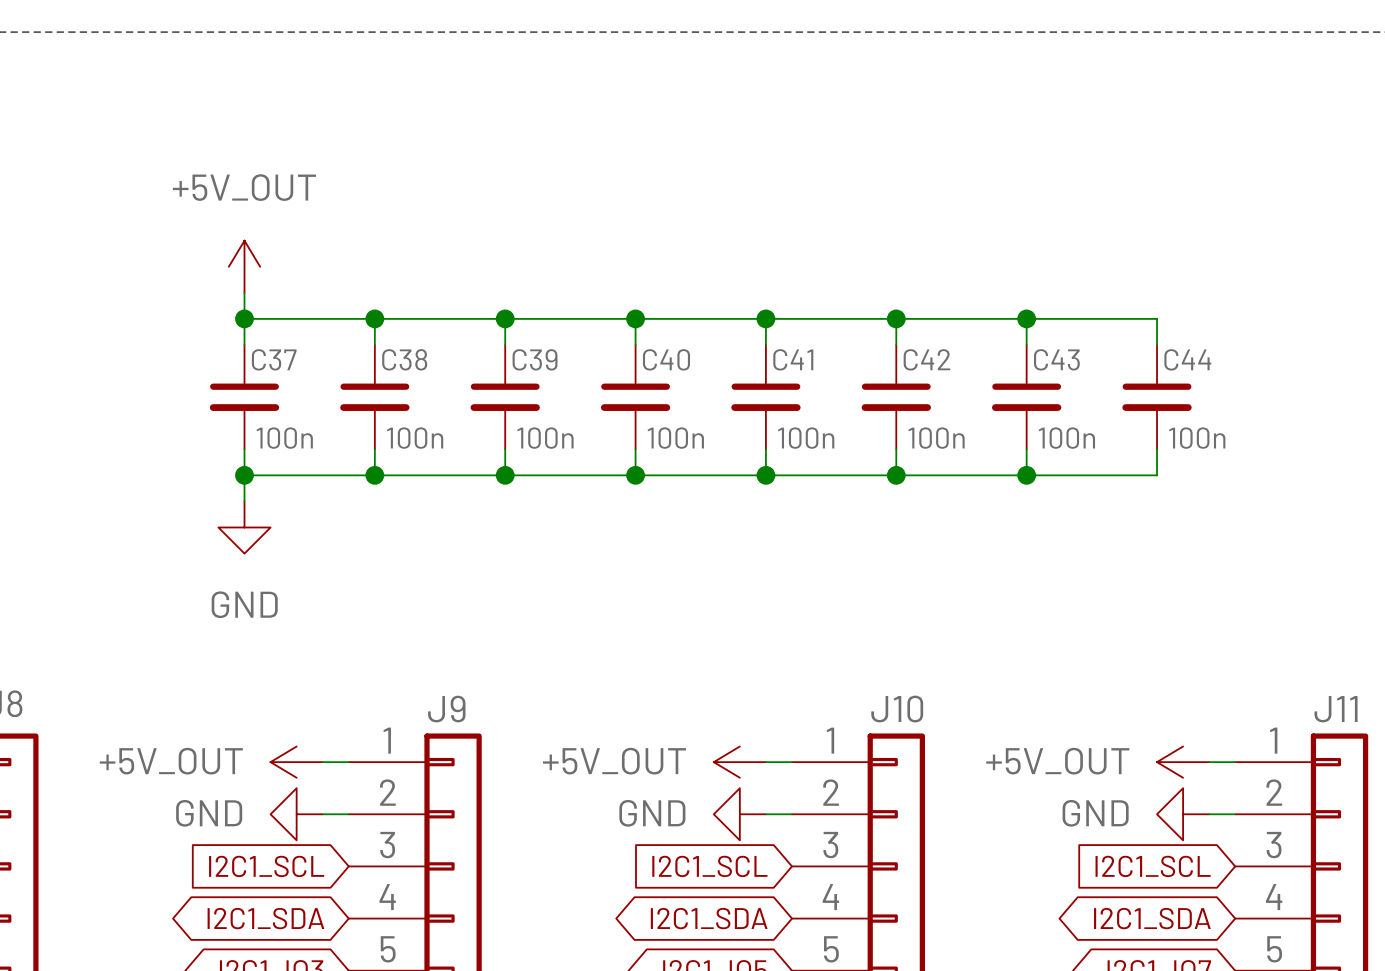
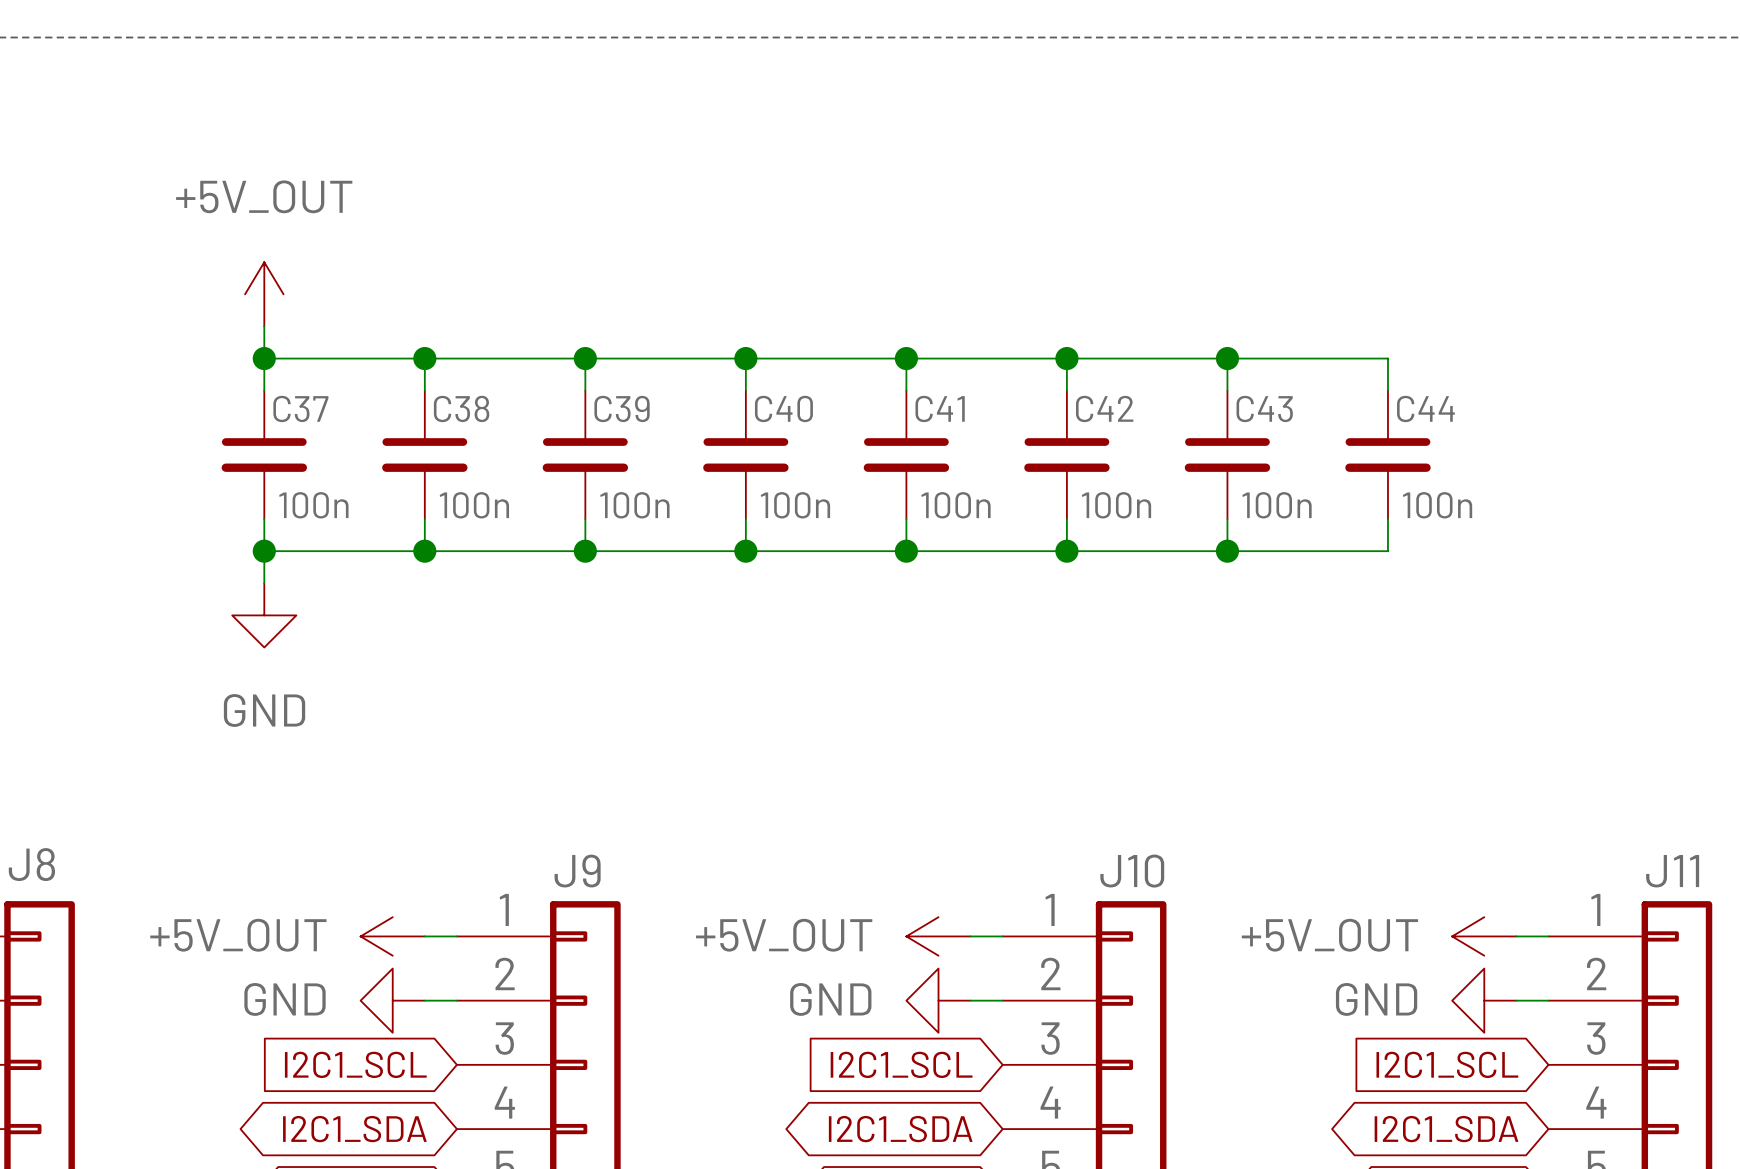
power symbol position: +5V_OUT (244, 266) -> +5V_OUT (264, 294)
junction: none -> (264, 358)
wire: (244, 292) (244, 344) -> (264, 326) (264, 390)
junction: none -> (424, 358)
junction: none -> (585, 358)
junction: none -> (745, 358)
junction: none -> (906, 358)
junction: none -> (1066, 358)
junction: none -> (1227, 358)
wire: (244, 318) (1157, 318) (1157, 344) -> (264, 358) (1387, 358) (1387, 390)
junction: (244, 318) -> none
wire: (374, 318) (374, 344) -> (424, 358) (424, 390)
junction: (374, 318) -> none
wire: (505, 318) (505, 344) -> (585, 358) (585, 390)
junction: (505, 318) -> none
wire: (635, 318) (635, 344) -> (745, 358) (745, 390)
junction: (635, 318) -> none
wire: (765, 318) (765, 344) -> (906, 358) (906, 390)
junction: (765, 318) -> none
wire: (896, 318) (896, 344) -> (1066, 358) (1066, 390)
junction: (896, 318) -> none
wire: (1026, 318) (1026, 344) -> (1227, 358) (1227, 390)
junction: (1026, 318) -> none
C37 position: (244, 397) -> (264, 454)
C38 position: (374, 397) -> (424, 454)
C39 position: (505, 397) -> (585, 454)
C40 position: (635, 397) -> (745, 454)
C41 position: (765, 397) -> (906, 454)
C42 position: (896, 397) -> (1066, 454)
C43 position: (1026, 397) -> (1227, 454)
C44 position: (1157, 397) -> (1387, 454)
junction: none -> (264, 551)
wire: (244, 449) (244, 501) -> (264, 519) (264, 583)
junction: none -> (424, 551)
wire: (374, 449) (374, 475) -> (424, 519) (424, 551)
junction: none -> (585, 551)
wire: (505, 449) (505, 475) -> (585, 519) (585, 551)
junction: none -> (745, 551)
wire: (635, 449) (635, 475) -> (745, 519) (745, 551)
junction: none -> (906, 551)
wire: (765, 449) (765, 475) -> (906, 519) (906, 551)
junction: none -> (1066, 551)
wire: (896, 449) (896, 475) -> (1066, 519) (1066, 551)
junction: none -> (1227, 551)
wire: (1026, 449) (1026, 475) -> (1227, 519) (1227, 551)
wire: (1157, 449) (1157, 475) (244, 475) -> (1387, 519) (1387, 551) (264, 551)
junction: (244, 475) -> none
junction: (374, 475) -> none
junction: (505, 475) -> none
junction: (635, 475) -> none
junction: (765, 475) -> none
junction: (896, 475) -> none
junction: (1026, 475) -> none
power symbol position: GND (244, 527) -> GND (264, 615)

